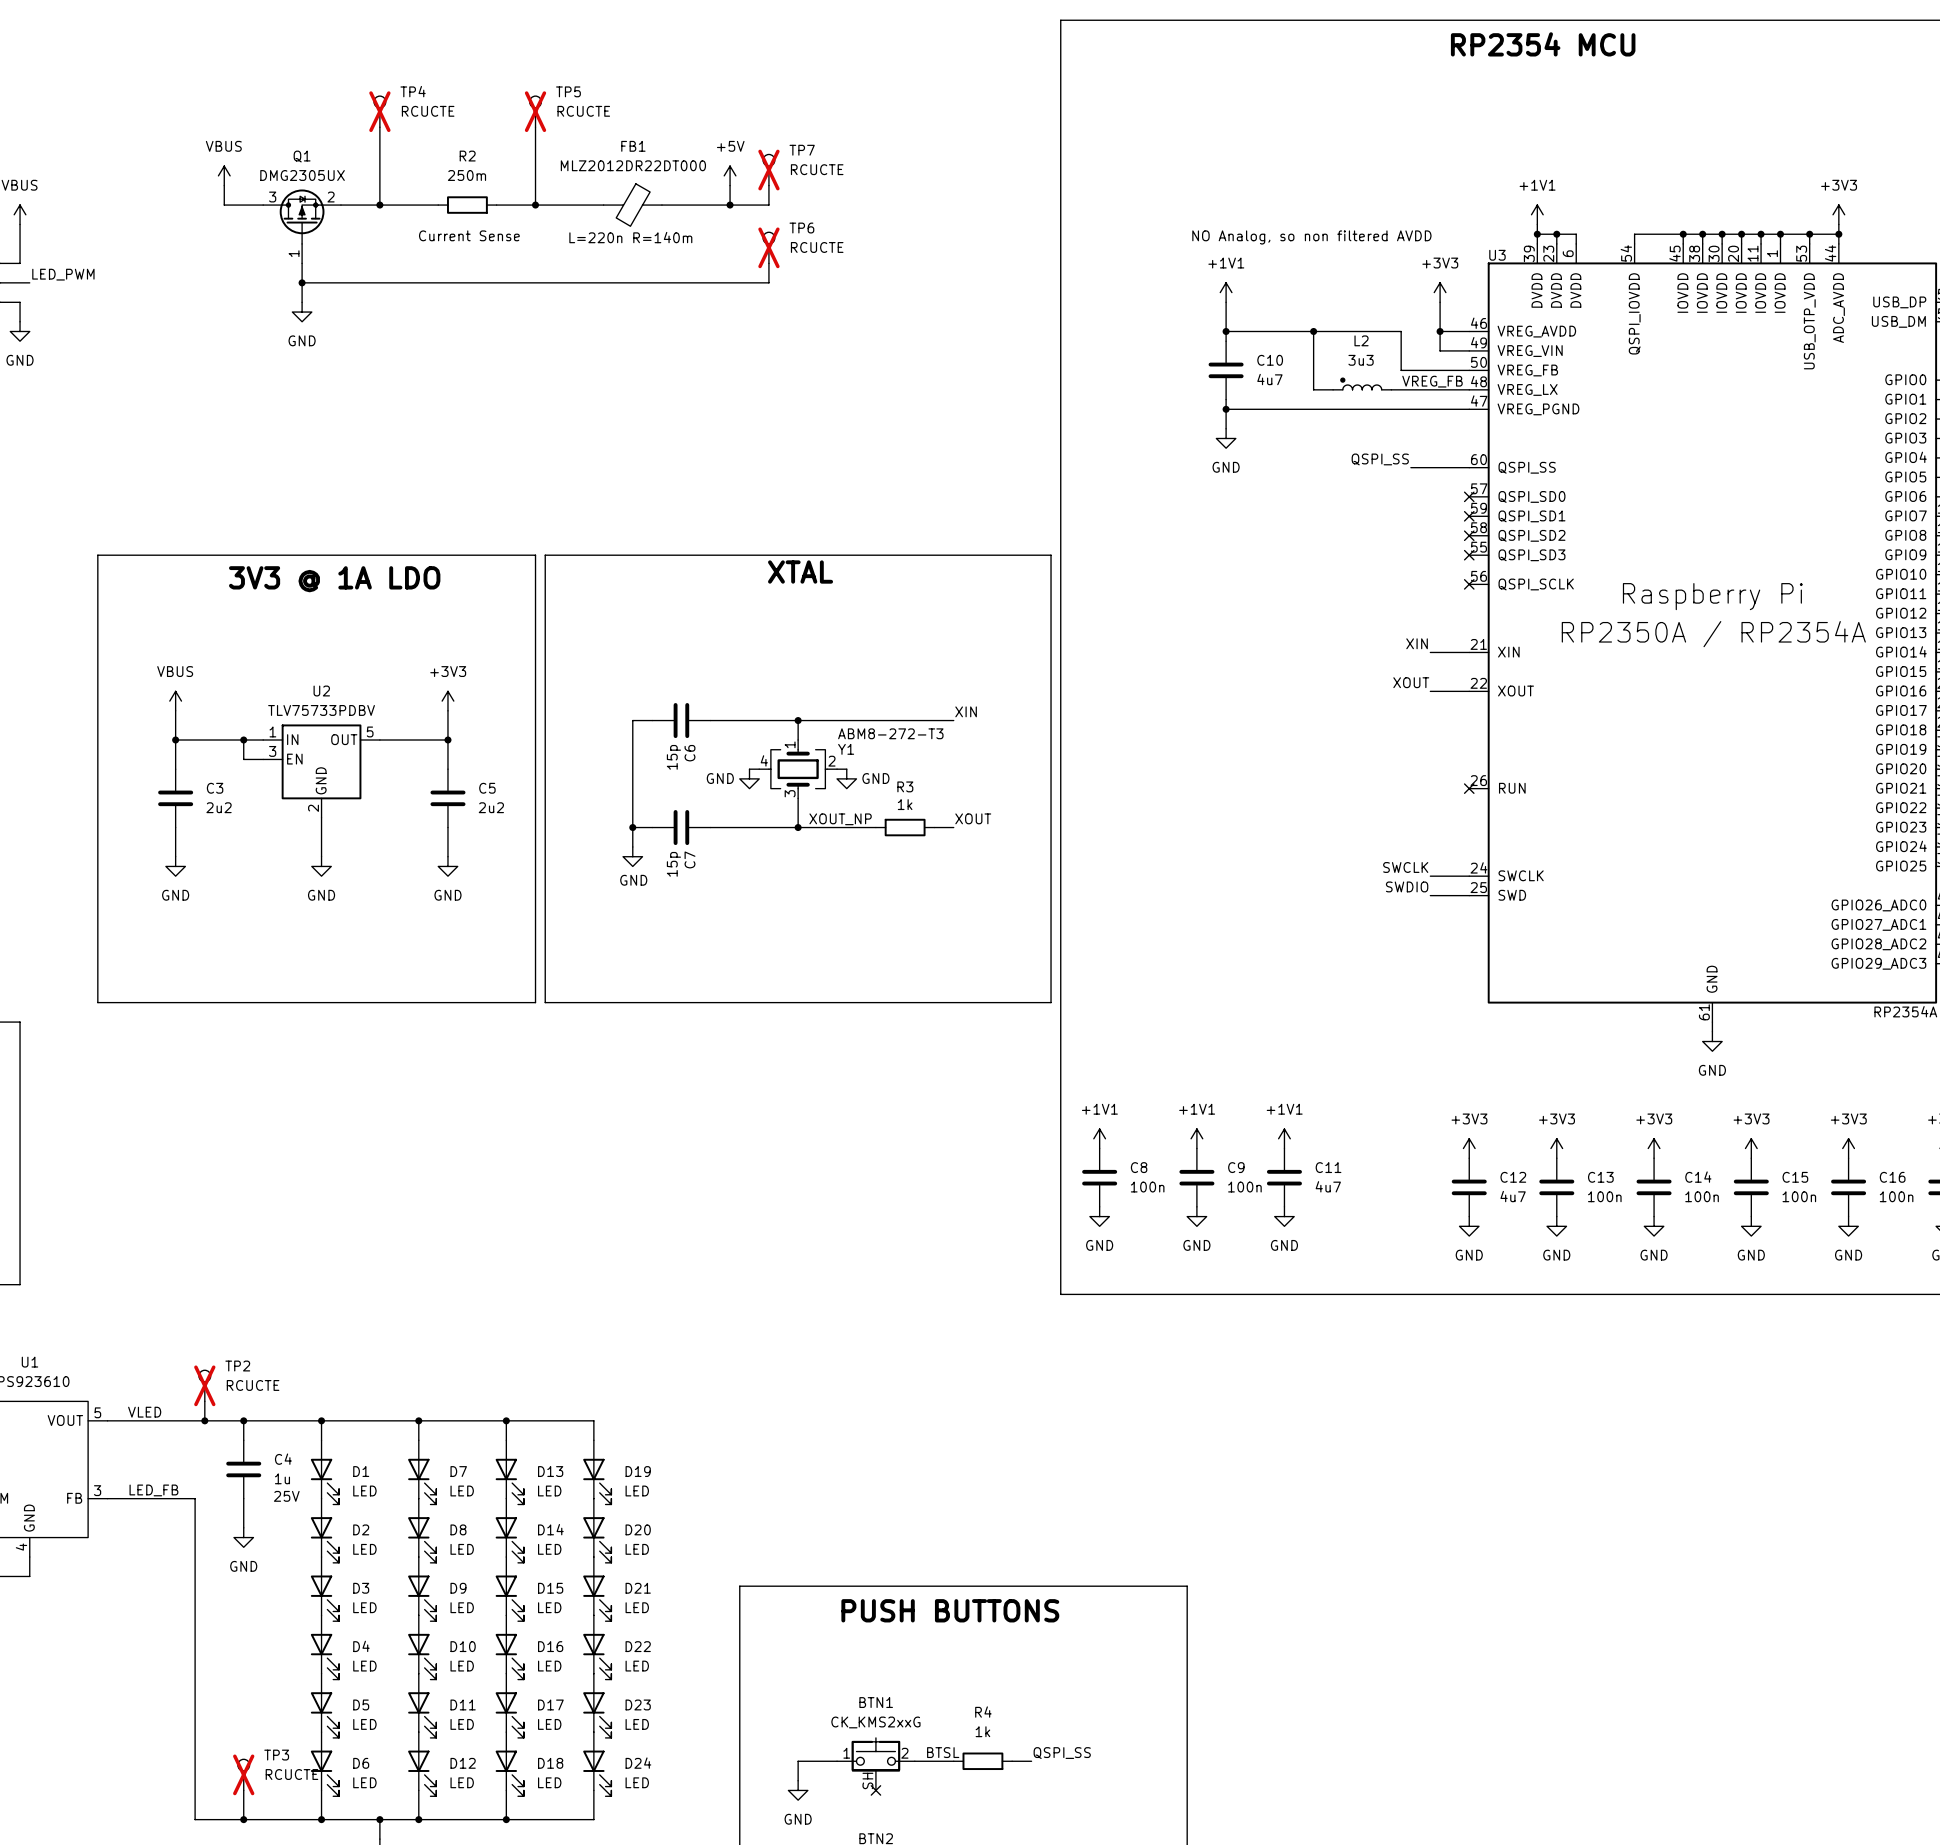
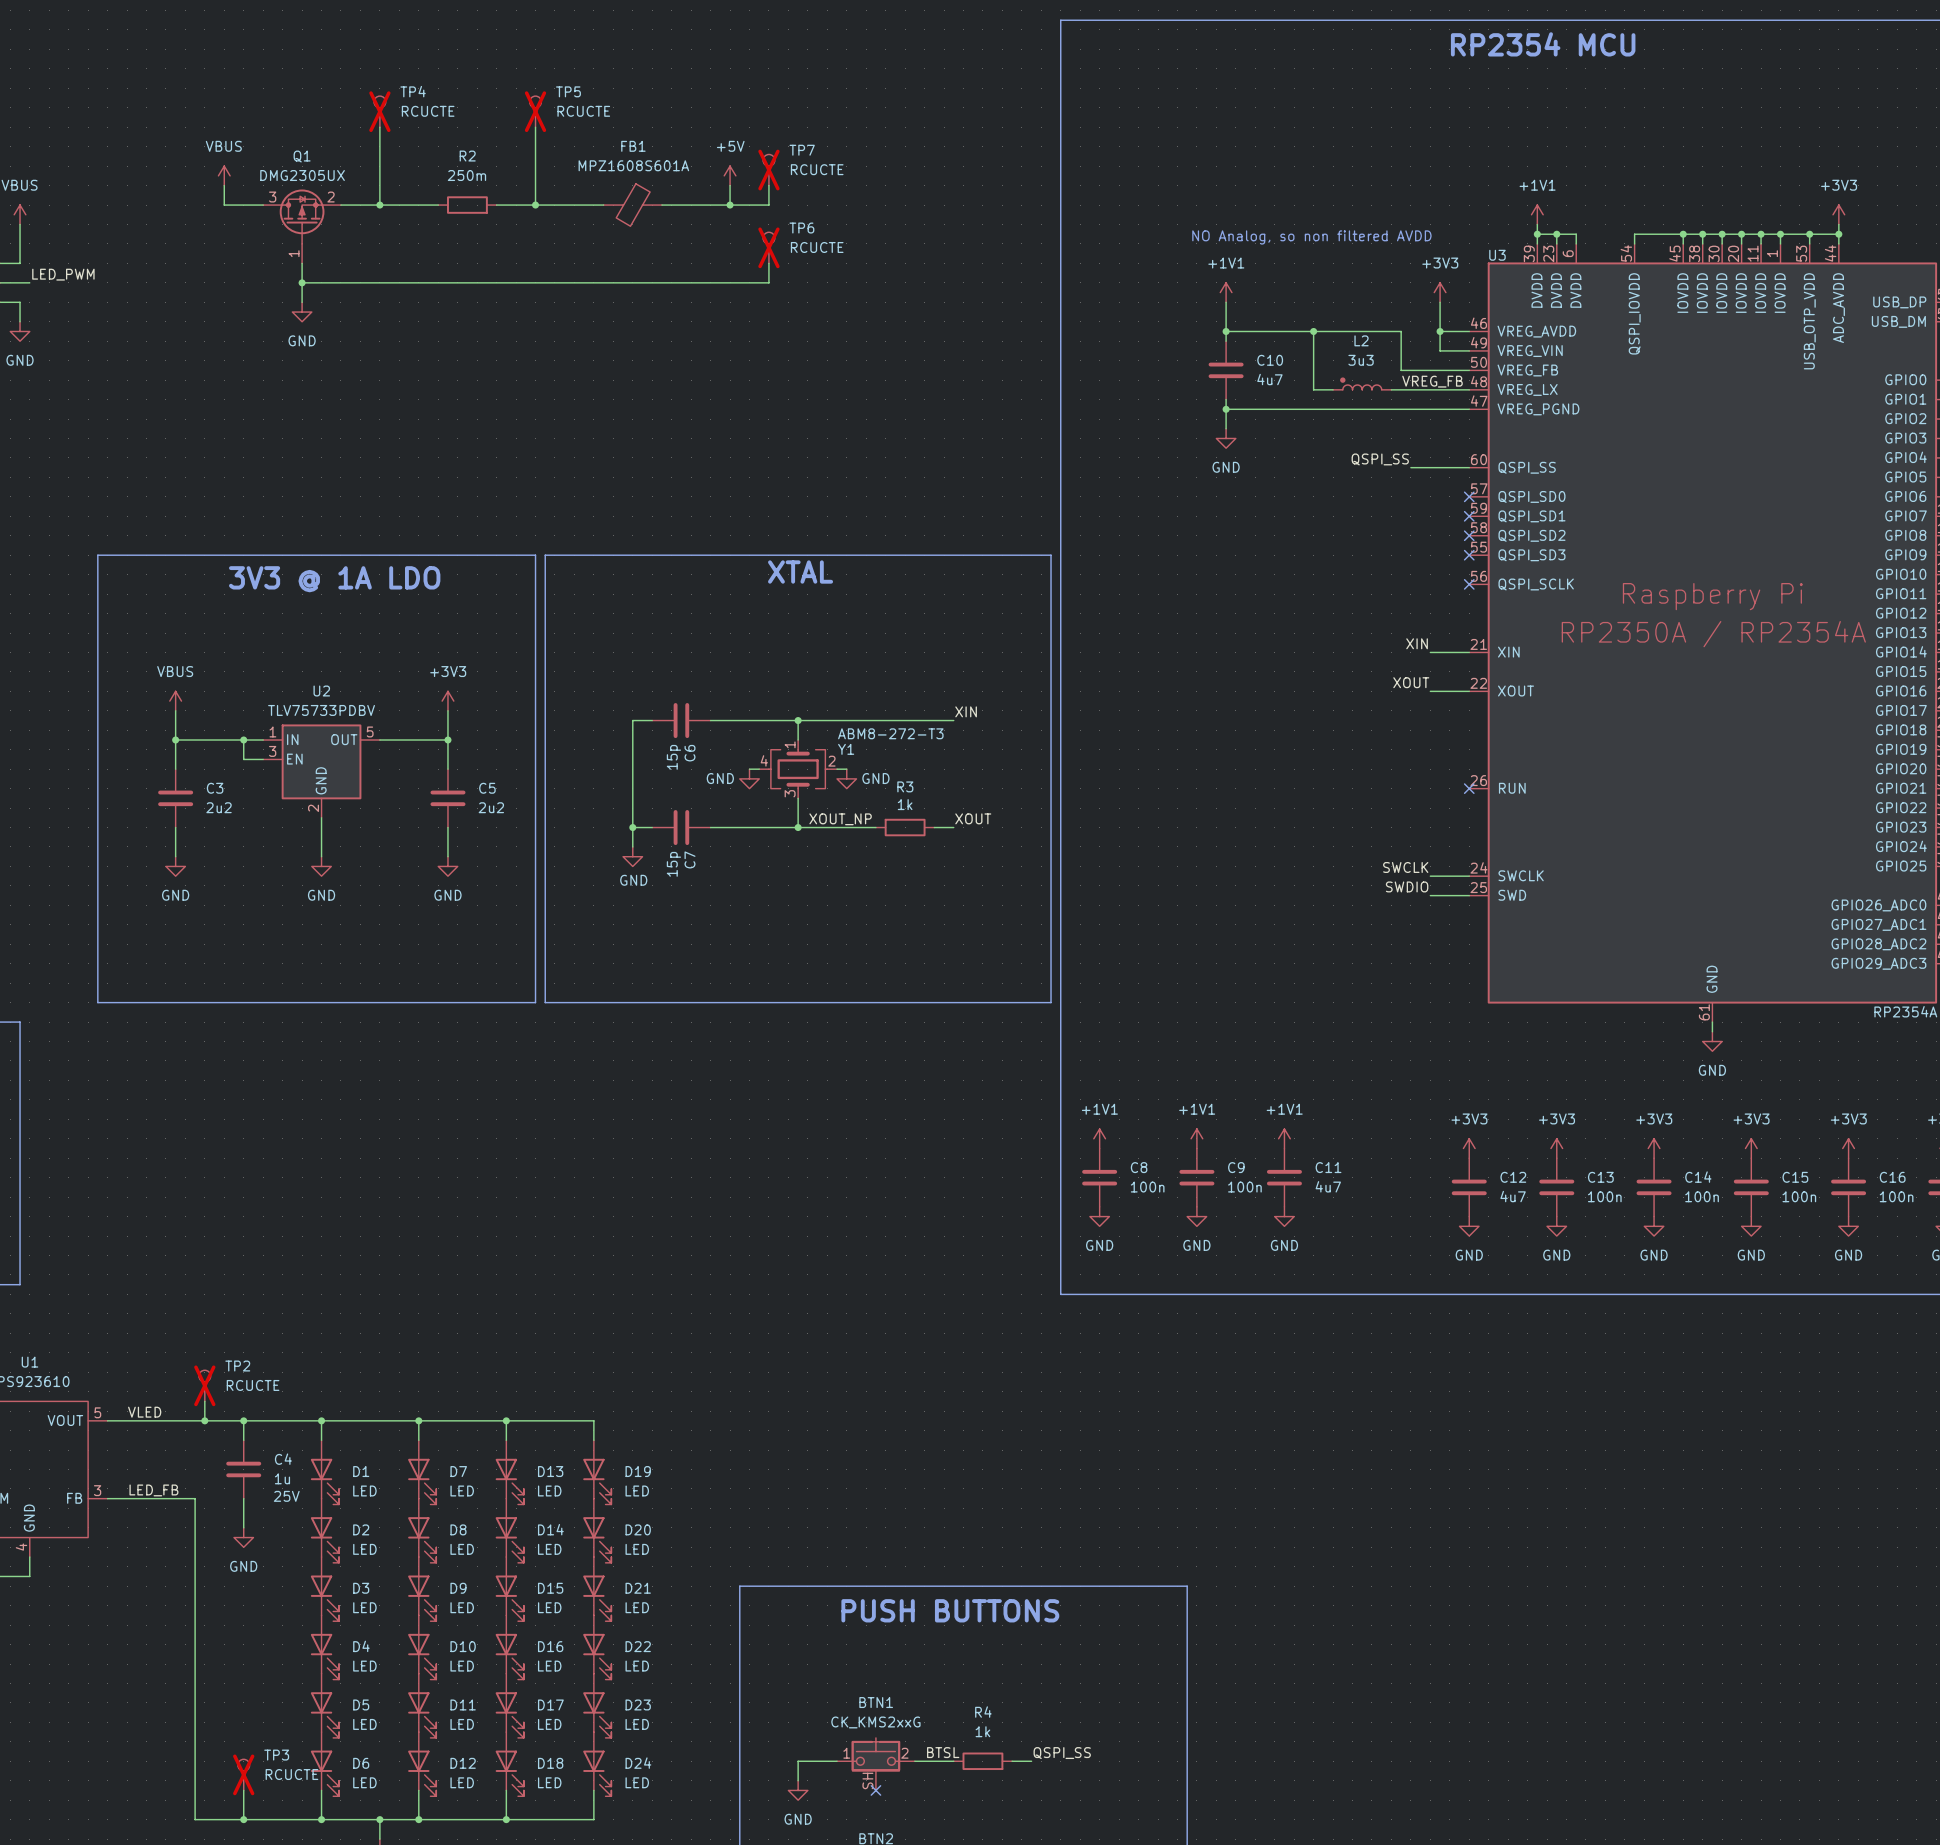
FB1 value: MLZ2012DR22DT000 (633, 165) -> MPZ1608S601A (633, 165)
text: Current Sense (469, 235) -> none
text: L=220n R=140m (630, 237) -> none

